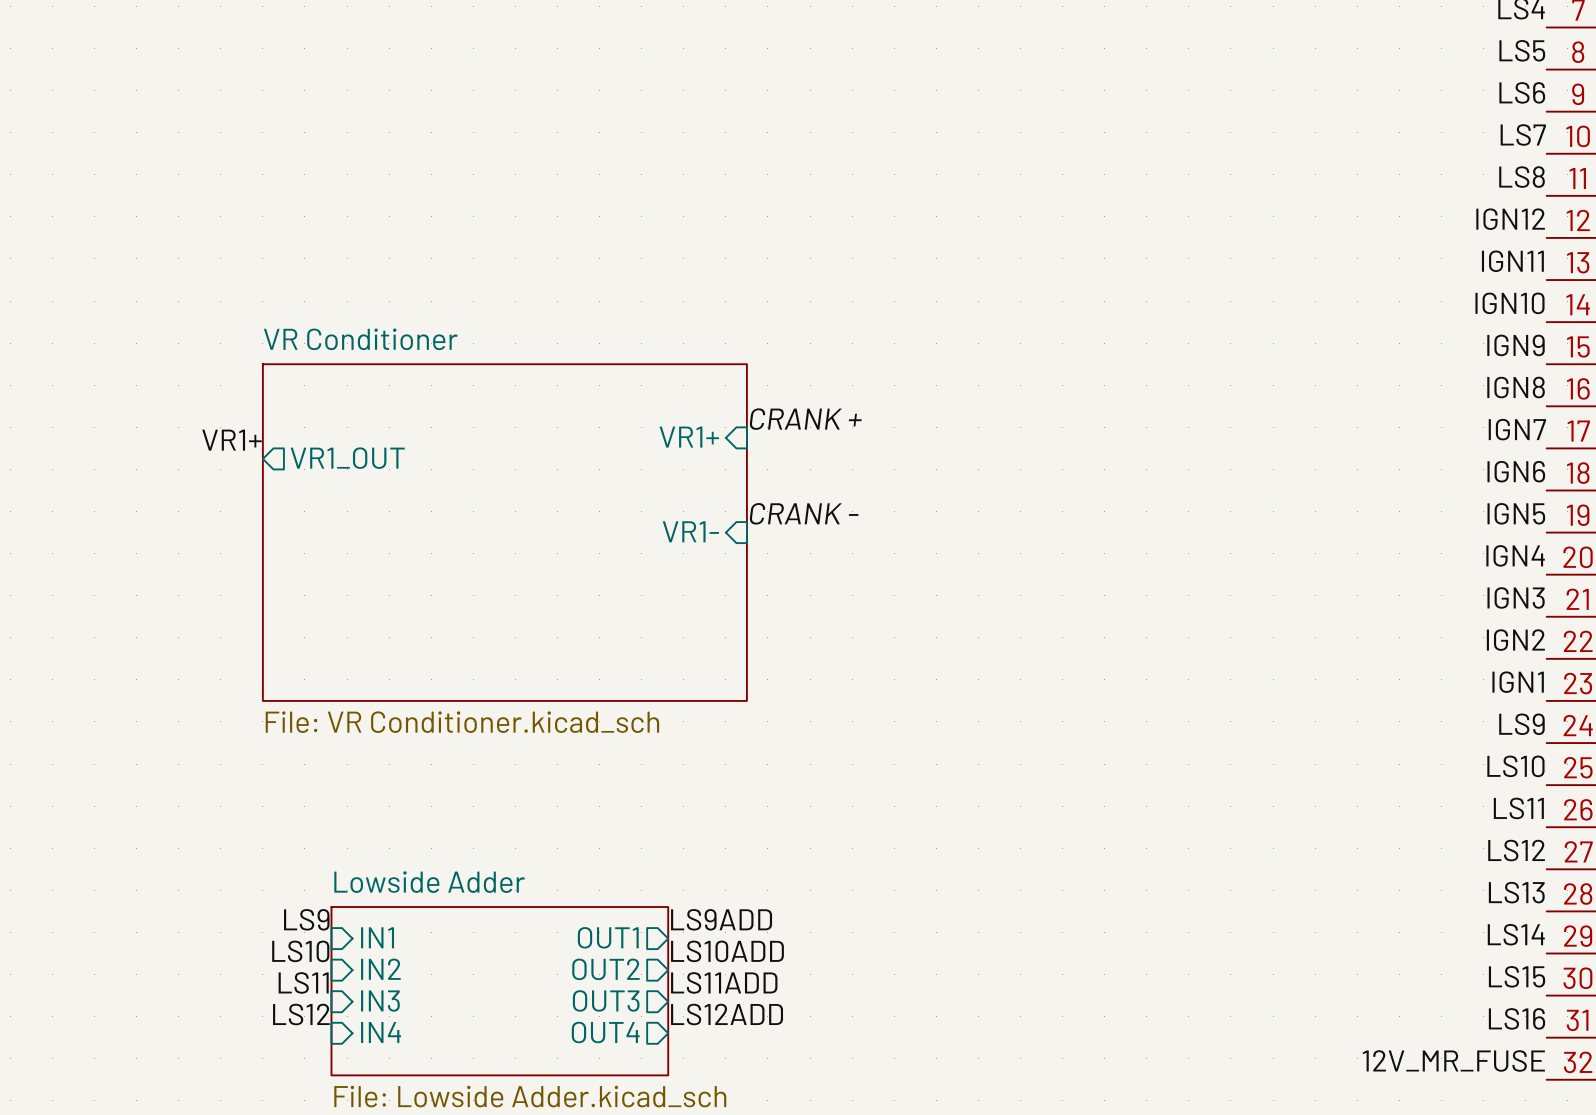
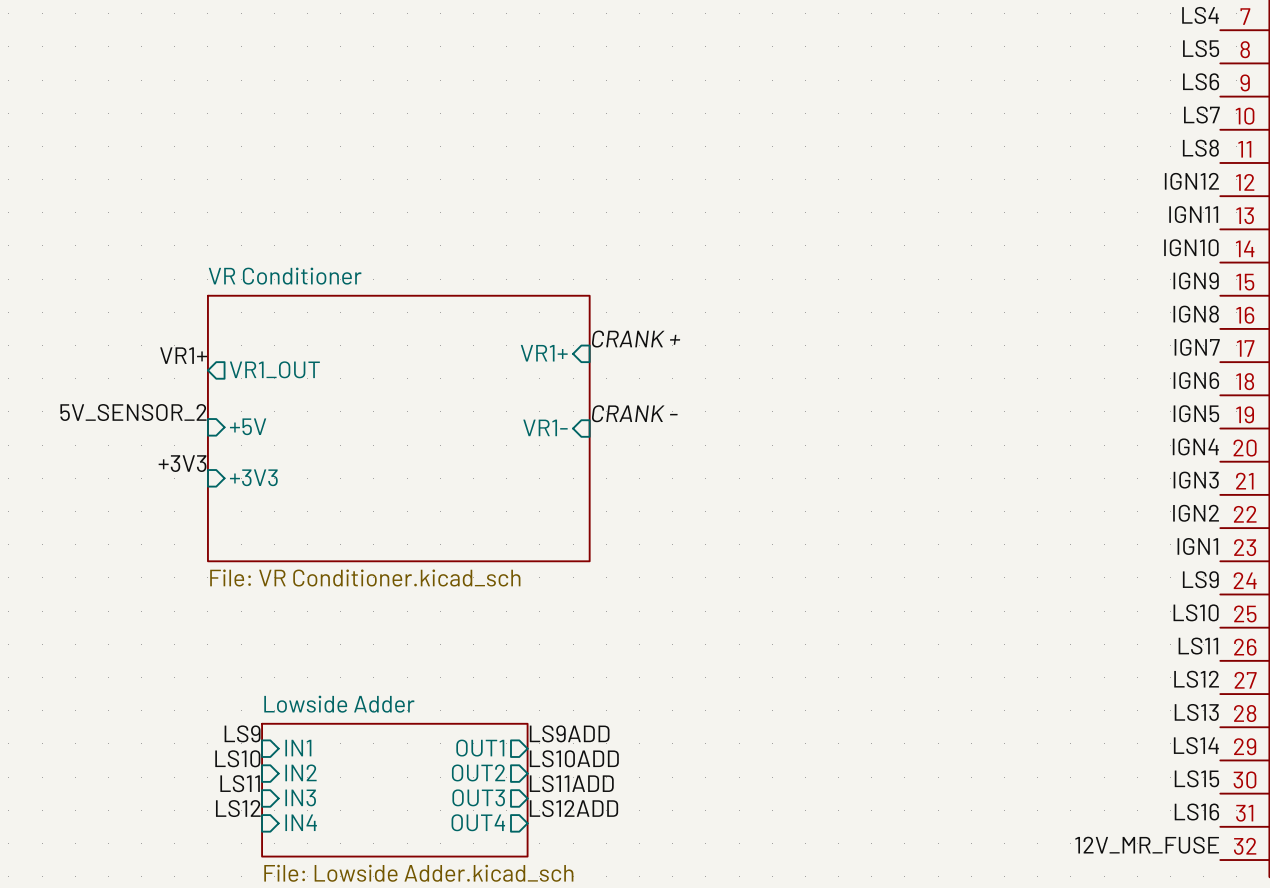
label: none -> 5V_SENSOR_2 (133, 412)
sheet pin: none -> +5V (248, 426)
label: none -> +3V3 (182, 463)
sheet pin: none -> +3V3 (253, 477)

